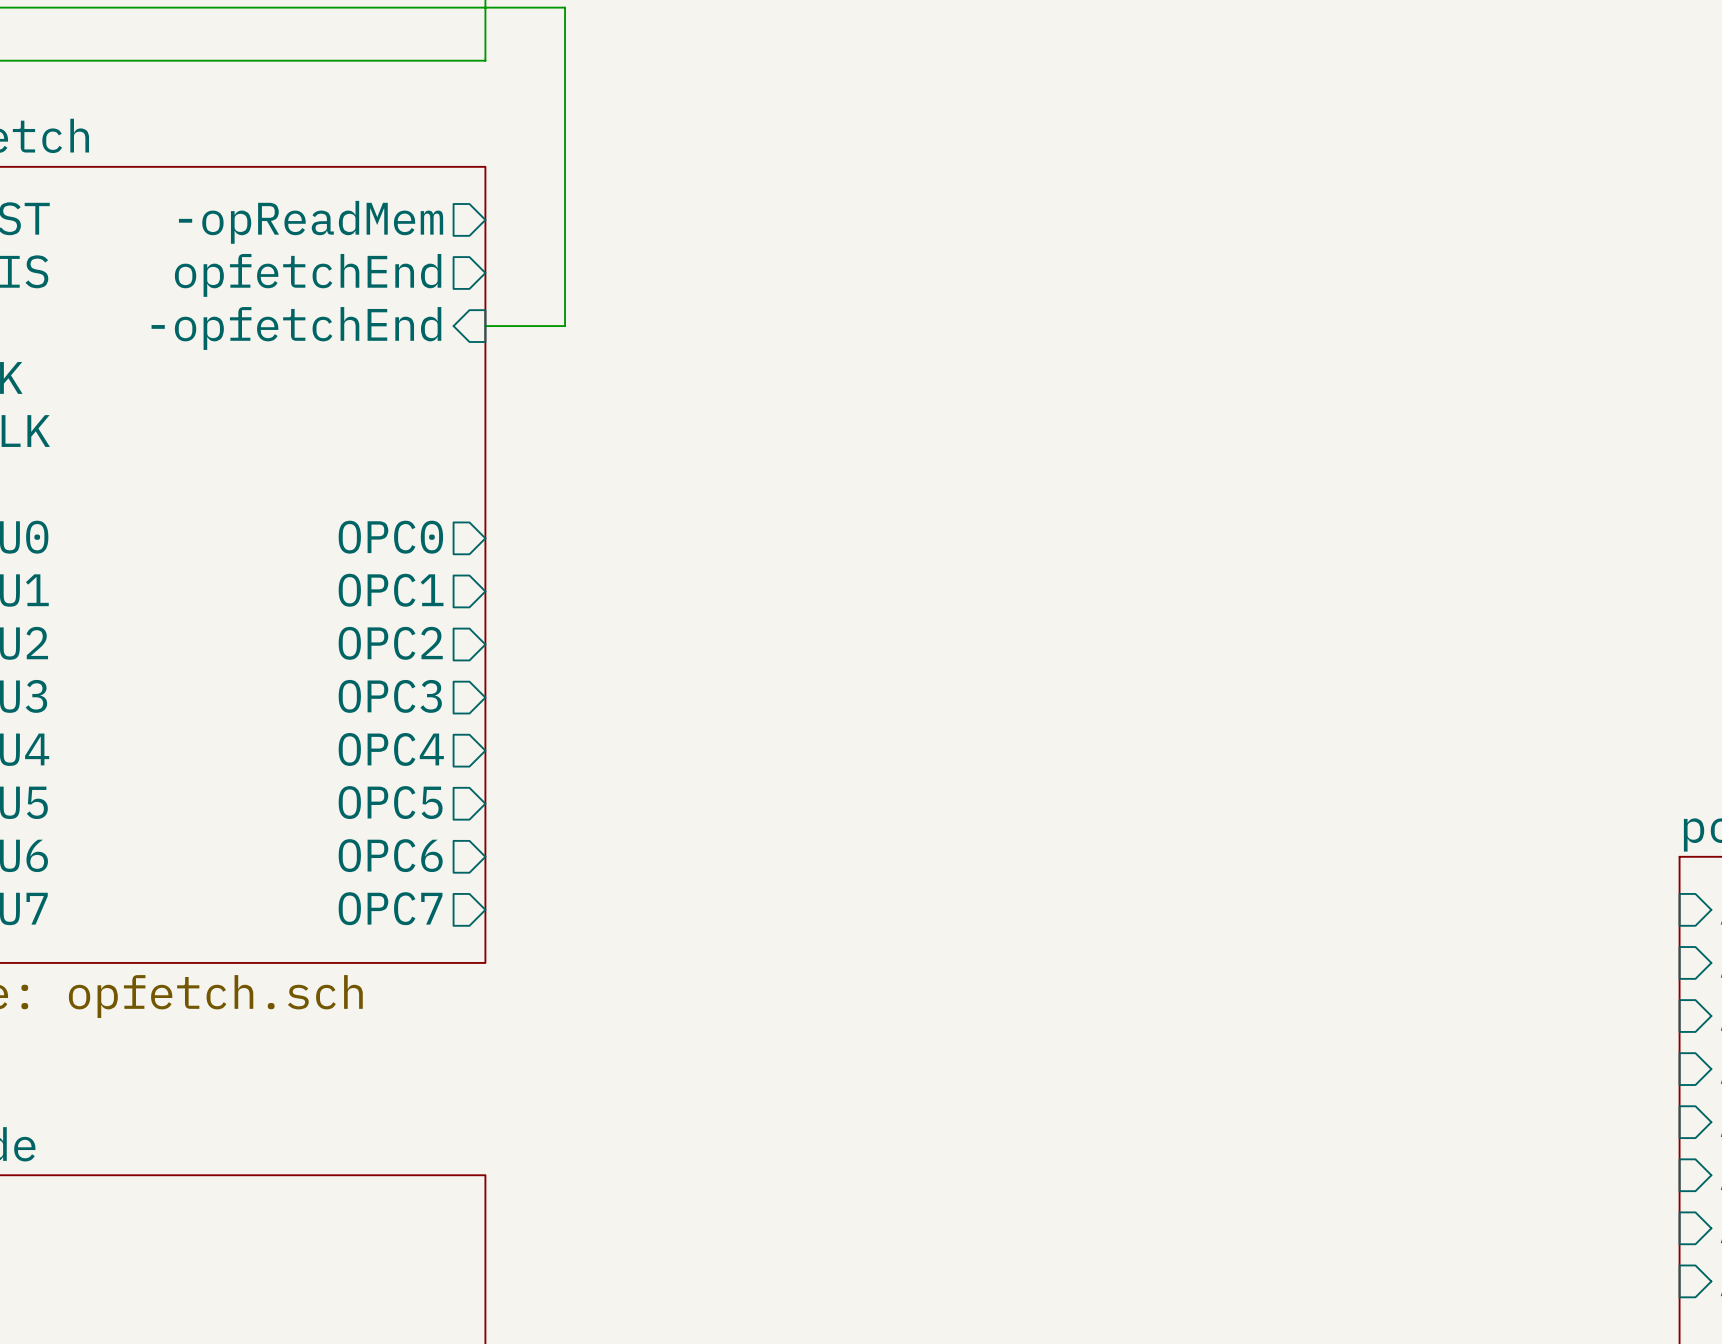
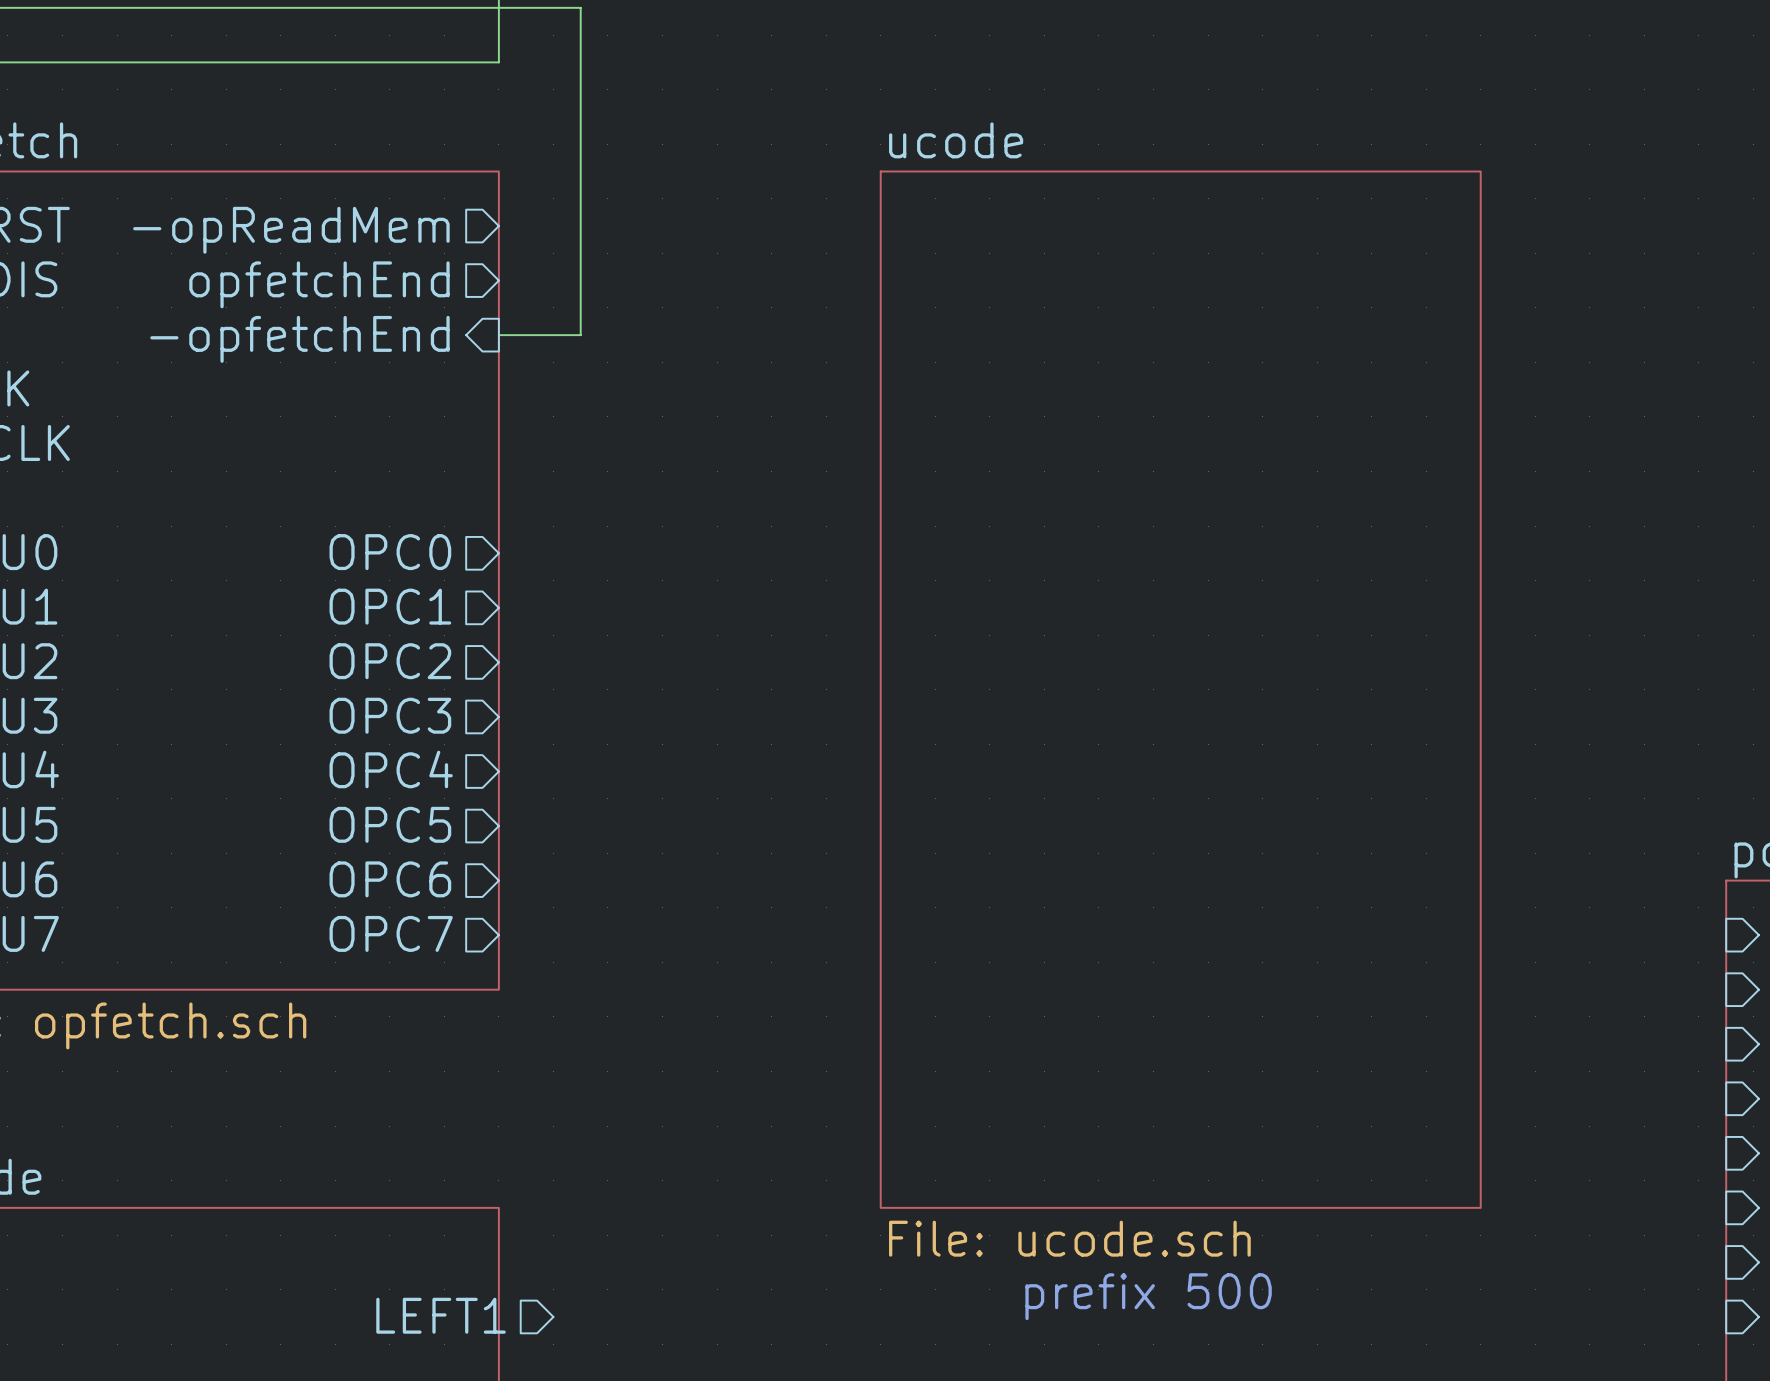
sheet ucode: none -> File: ucode.sch (1180, 689)
text: none -> prefix 500 (1148, 1296)
sheet pin: none -> LEFT1 (441, 1315)

